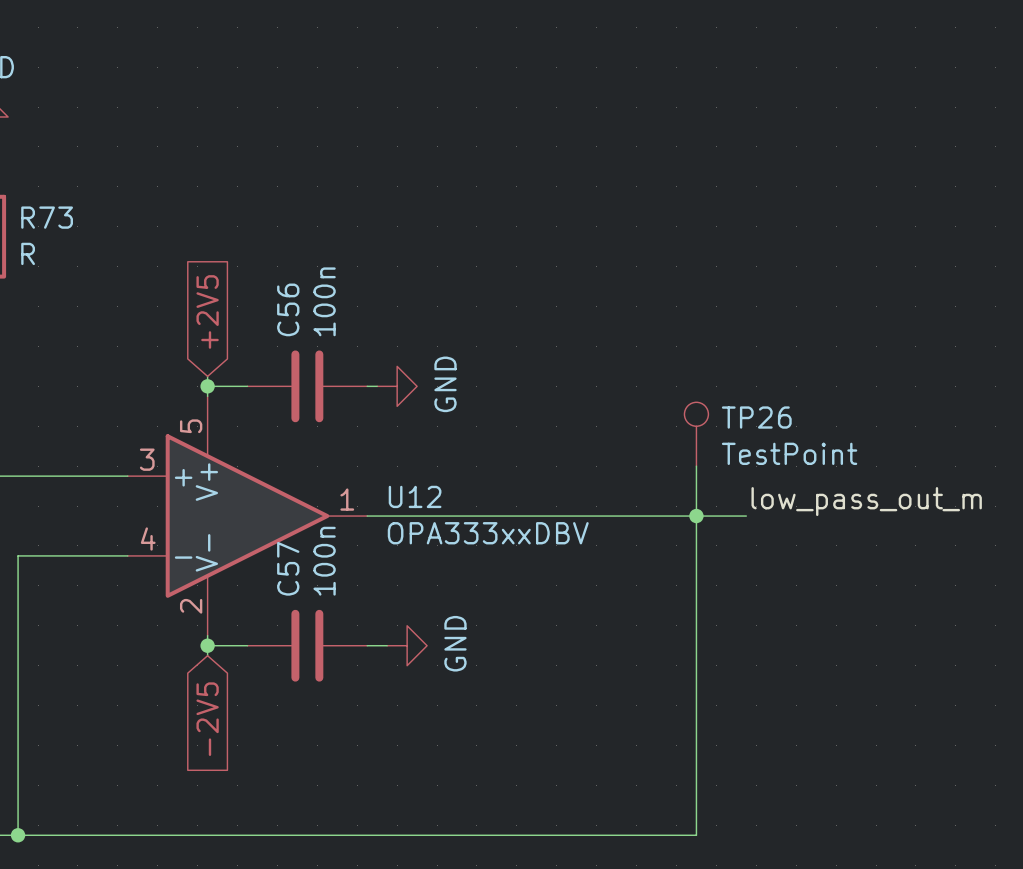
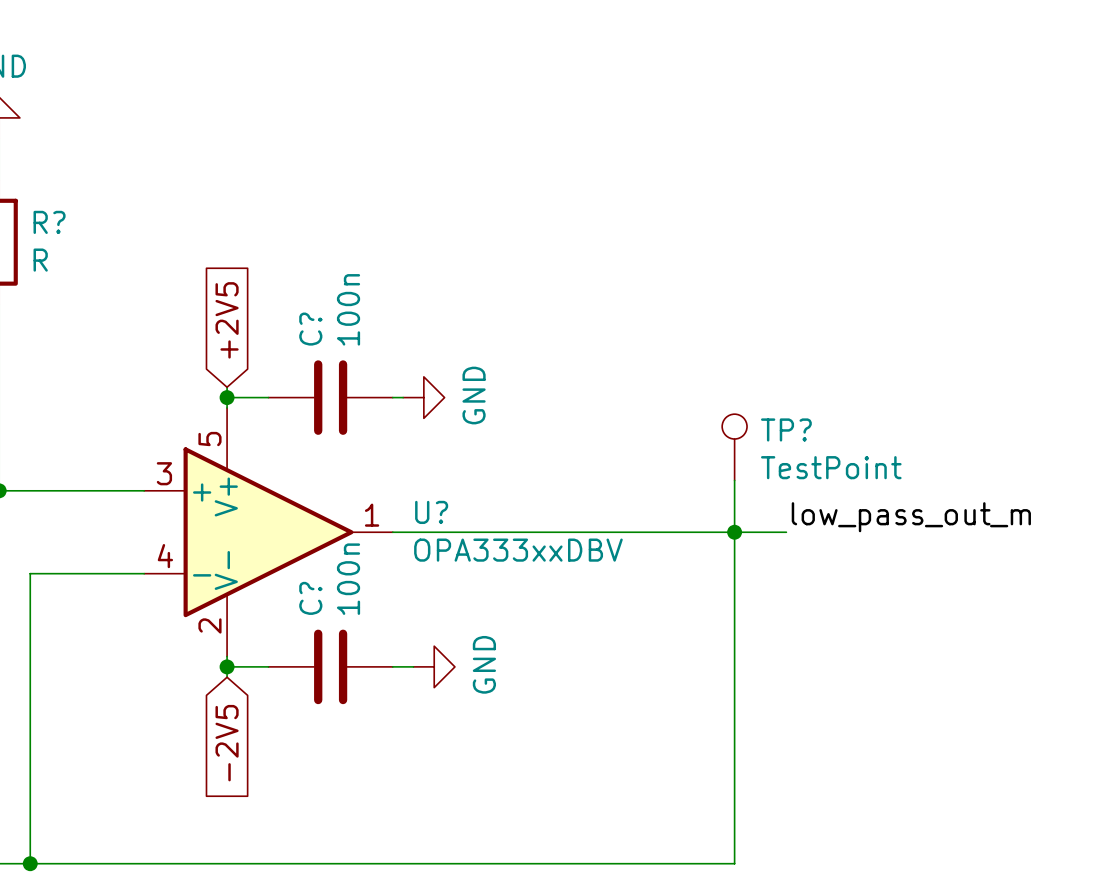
R73 name: R73 (47, 217) -> R? (49, 222)
C56 name: C56 (288, 309) -> C? (310, 329)
TP26 name: TP26 (756, 417) -> TP? (786, 429)
U12 name: U12 (415, 496) -> U? (431, 512)
C57 name: C57 (288, 568) -> C? (310, 598)

